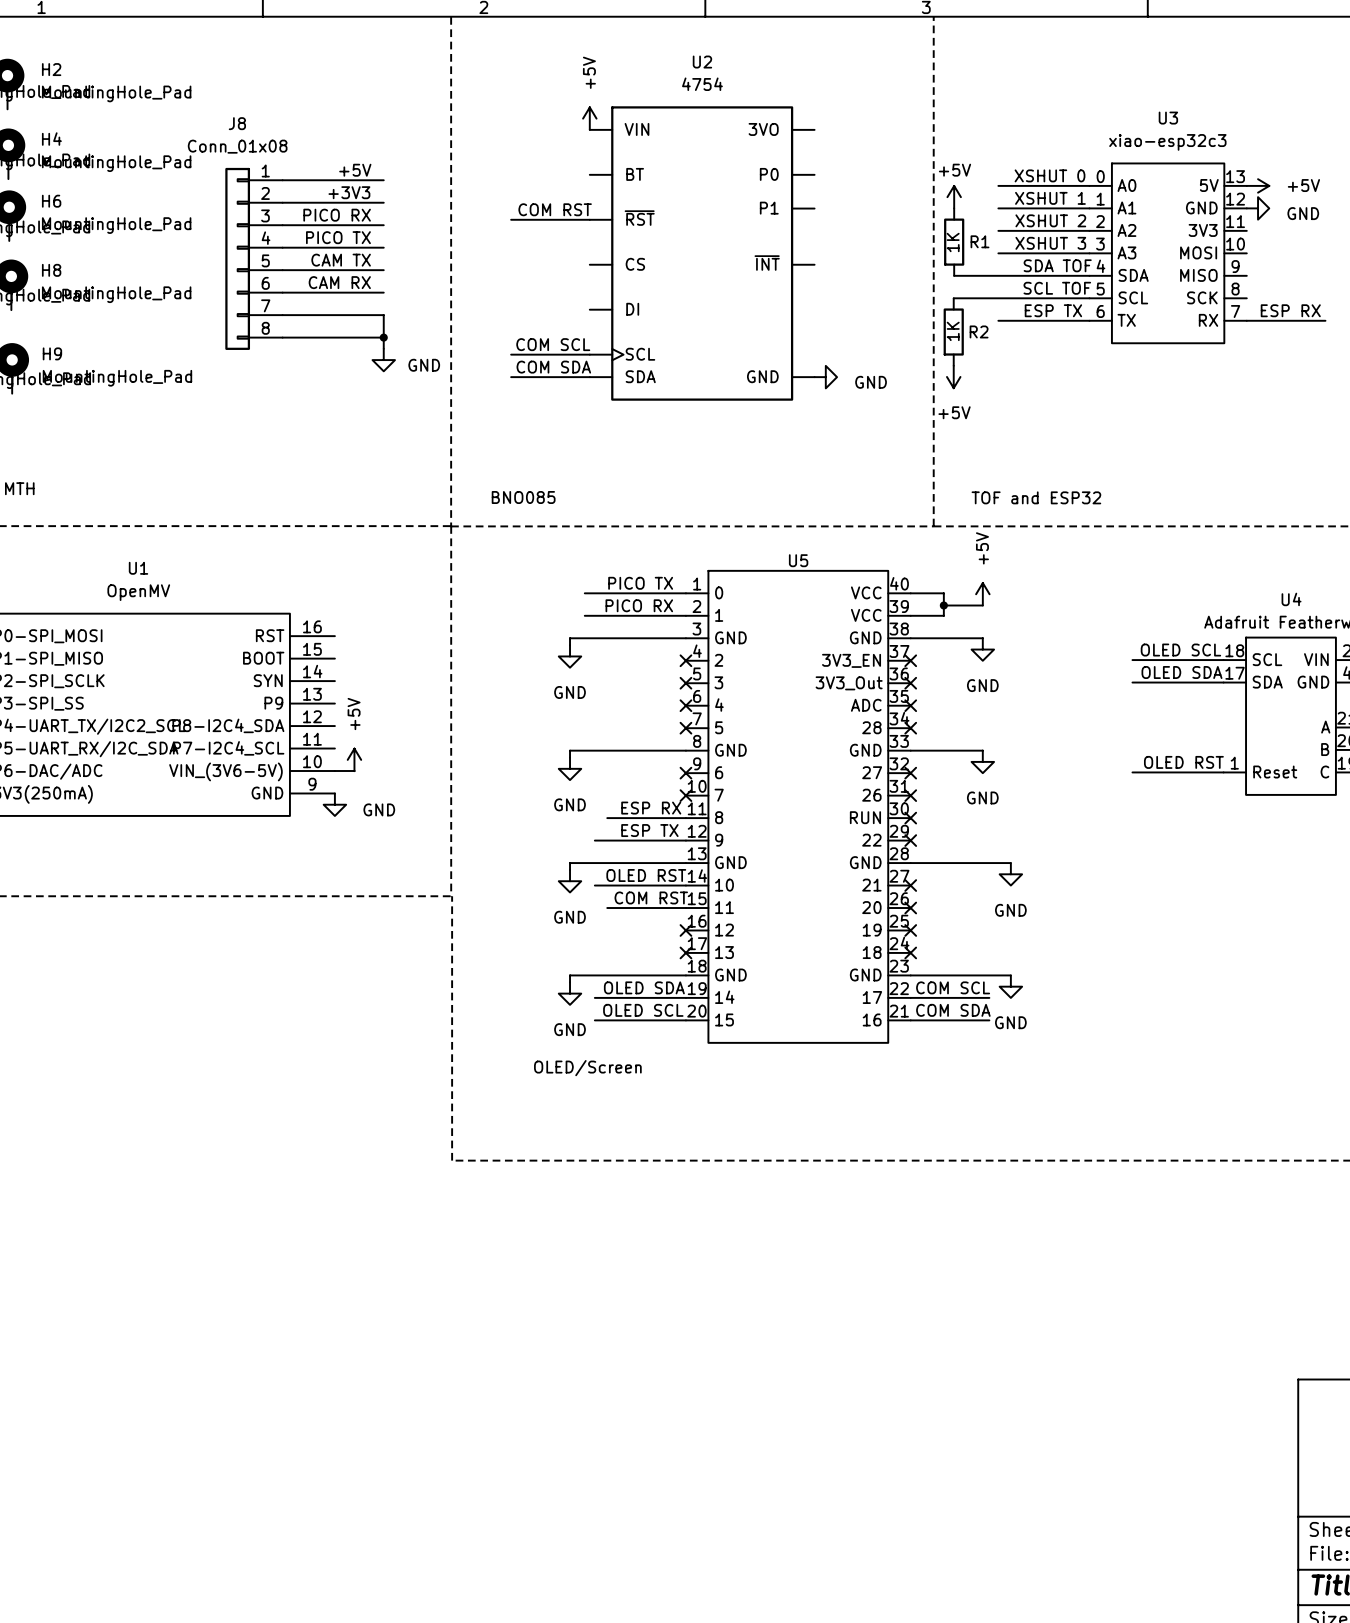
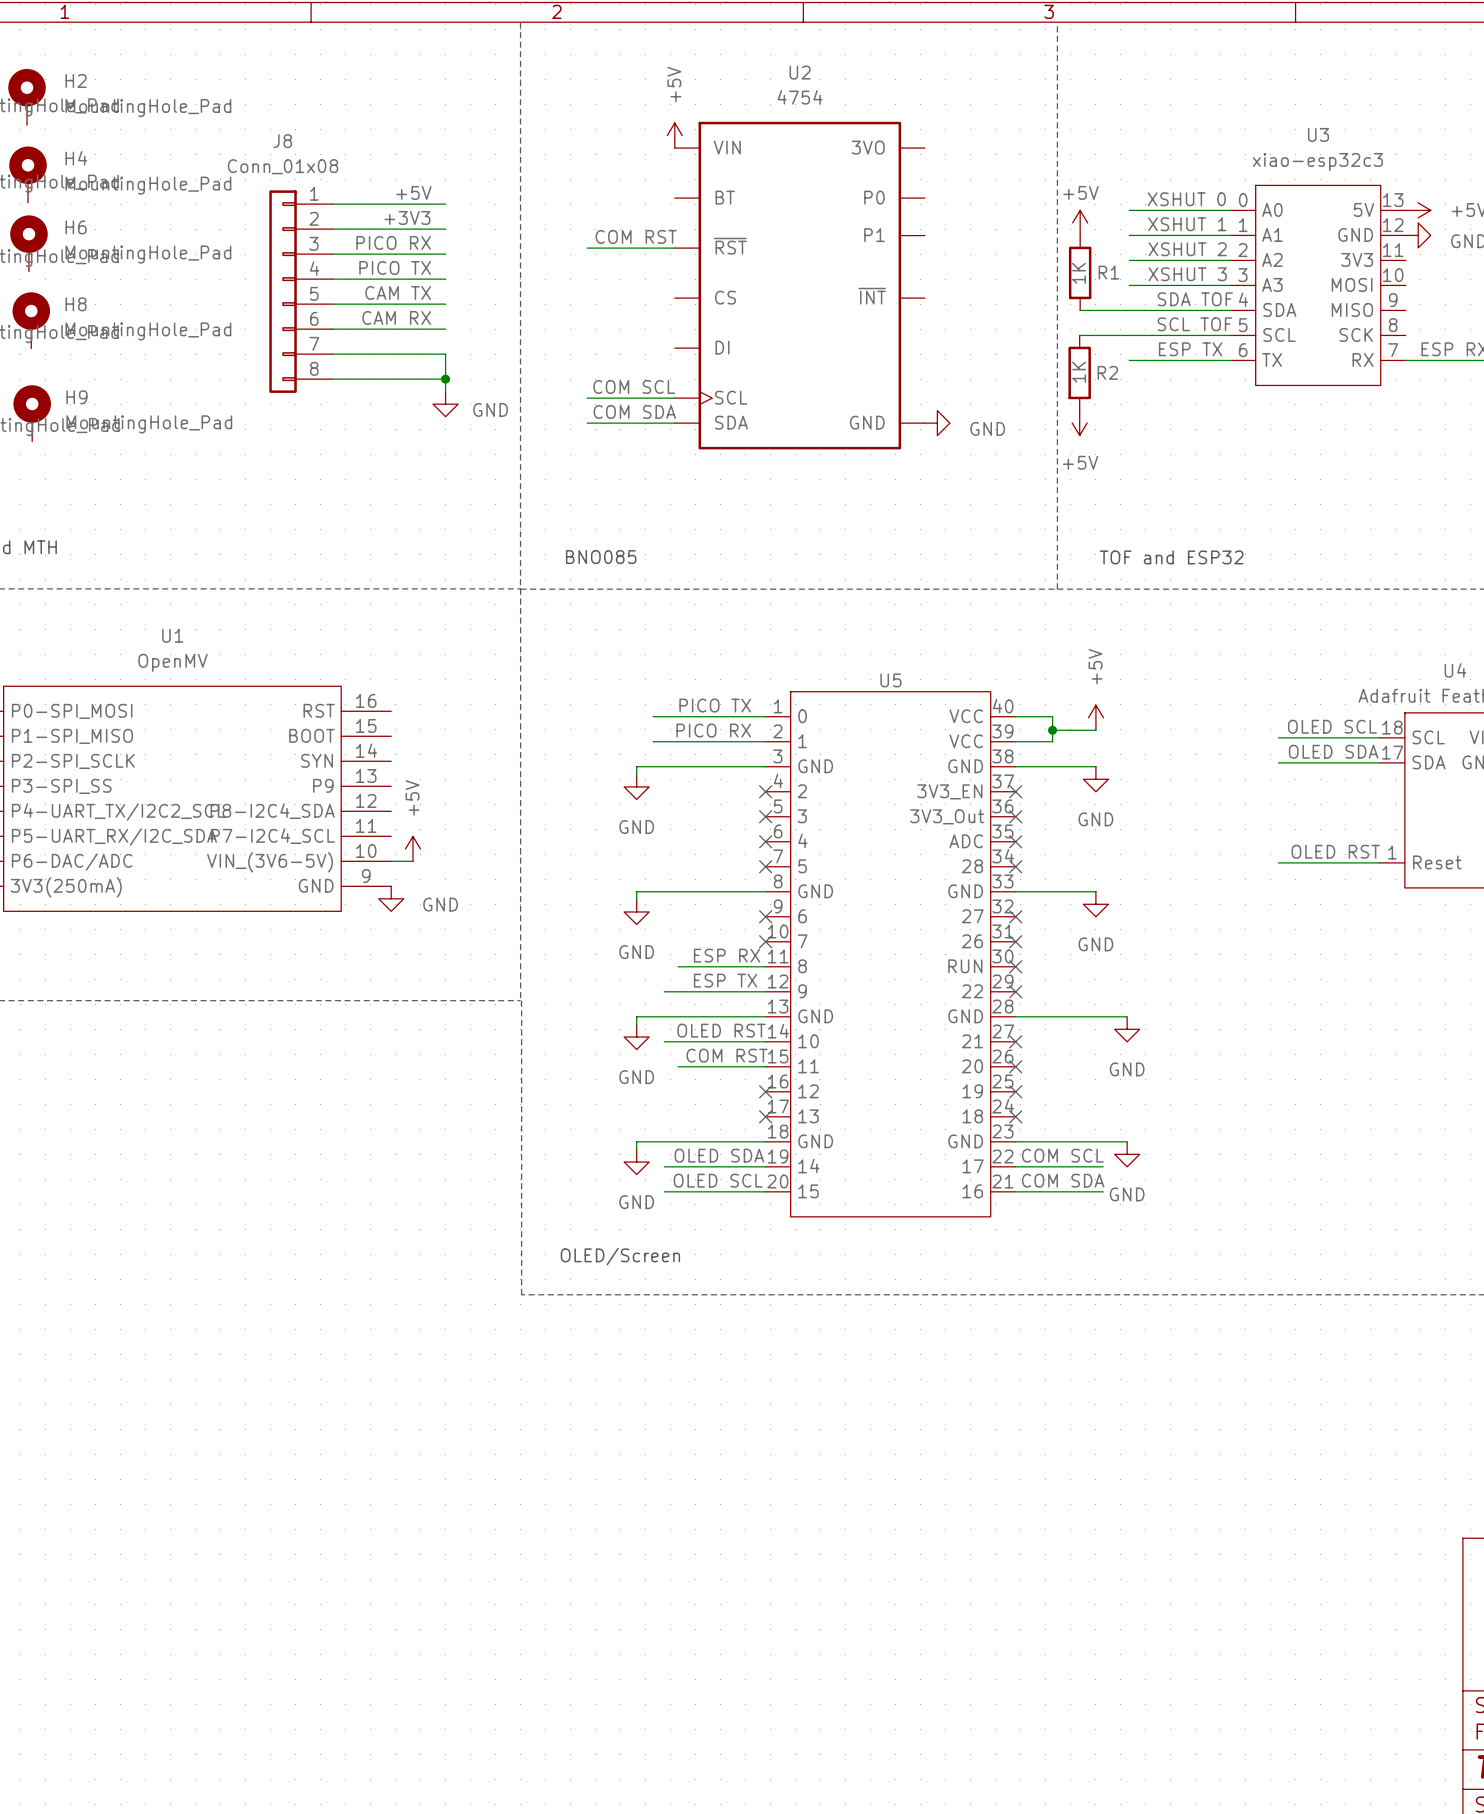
label position: PICO TX (640, 583) -> PICO TX (715, 705)
wire: (584, 593) (685, 593) -> (653, 716) (765, 716)
wire: (910, 593) (943, 593) (943, 615) (910, 615) -> (1015, 716) (1052, 716) (1052, 741) (1015, 741)
power symbol position: +5V (982, 594) -> +5V (1095, 717)
label position: PICO RX (639, 605) -> PICO RX (713, 730)
wire: (943, 605) (982, 605) -> (1052, 730) (1095, 730)
junction position: (943, 605) -> (1052, 730)
wire: (584, 615) (685, 615) -> (653, 741) (765, 741)
wire: (685, 638) (570, 638) (570, 645) -> (765, 766) (636, 766) (636, 774)
wire: (910, 638) (982, 638) -> (1015, 766) (1095, 766)
power symbol: GND (982, 649) -> none
power symbol: GND (570, 656) -> none
no-connect mark: (685, 660) -> none
no-connect mark: (910, 660) -> none
no-connect mark: (685, 683) -> none
no-connect mark: (910, 683) -> none
power symbol: none -> GND (1095, 779)
power symbol: none -> GND (636, 786)
no-connect mark: (685, 705) -> none
no-connect mark: (910, 705) -> none
no-connect mark: none -> (765, 791)
no-connect mark: none -> (1015, 791)
no-connect mark: (685, 728) -> none
no-connect mark: (910, 728) -> none
no-connect mark: none -> (765, 816)
no-connect mark: none -> (1015, 816)
wire: (685, 750) (570, 750) (570, 757) -> (765, 891) (636, 891) (636, 899)
wire: (910, 750) (982, 750) -> (1015, 891) (1095, 891)
no-connect mark: none -> (765, 841)
no-connect mark: none -> (1015, 841)
power symbol: GND (982, 761) -> none
power symbol: GND (570, 768) -> none
no-connect mark: (685, 773) -> none
no-connect mark: (910, 773) -> none
no-connect mark: none -> (765, 866)
no-connect mark: none -> (1015, 866)
no-connect mark: (685, 795) -> none
no-connect mark: (910, 795) -> none
U5 position: (798, 806) -> (890, 954)
label position: ESP RX (651, 808) -> ESP RX (727, 955)
power symbol: none -> GND (1095, 904)
power symbol: none -> GND (636, 911)
wire: (607, 818) (685, 818) -> (678, 966) (765, 966)
no-connect mark: (910, 818) -> none
no-connect mark: none -> (765, 916)
no-connect mark: none -> (1015, 916)
label position: ESP TX (649, 830) -> ESP TX (725, 980)
wire: (594, 840) (685, 840) -> (664, 991) (765, 991)
no-connect mark: (910, 840) -> none
no-connect mark: none -> (765, 941)
no-connect mark: none -> (1015, 941)
wire: (685, 863) (570, 863) (570, 869) -> (765, 1016) (636, 1016) (636, 1024)
wire: (910, 863) (1010, 863) -> (1015, 1016) (1127, 1016)
no-connect mark: none -> (1015, 966)
power symbol: GND (1010, 874) -> none
label position: OLED RST (646, 875) -> OLED RST (721, 1030)
power symbol: GND (570, 881) -> none
wire: (594, 885) (685, 885) -> (664, 1041) (765, 1041)
no-connect mark: (910, 885) -> none
no-connect mark: none -> (1015, 991)
label position: COM RST (651, 897) -> COM RST (727, 1055)
wire: (607, 908) (685, 908) -> (678, 1066) (765, 1066)
no-connect mark: (910, 908) -> none
power symbol: none -> GND (1127, 1029)
power symbol: none -> GND (636, 1037)
no-connect mark: (685, 930) -> none
no-connect mark: (910, 930) -> none
no-connect mark: none -> (1015, 1041)
no-connect mark: (685, 952) -> none
no-connect mark: (910, 952) -> none
no-connect mark: none -> (1015, 1066)
wire: (685, 975) (570, 975) (570, 982) -> (765, 1141) (636, 1141) (636, 1149)
wire: (910, 975) (1010, 975) -> (1015, 1141) (1127, 1141)
no-connect mark: none -> (765, 1091)
no-connect mark: none -> (1015, 1091)
power symbol: GND (1010, 986) -> none
label position: OLED SDA (644, 987) -> OLED SDA (719, 1155)
label position: COM SCL (953, 987) -> COM SCL (1062, 1155)
power symbol: GND (570, 993) -> none
wire: (594, 997) (685, 997) -> (664, 1166) (765, 1166)
wire: (910, 997) (989, 997) -> (1015, 1166) (1103, 1166)
no-connect mark: none -> (765, 1116)
no-connect mark: none -> (1015, 1116)
label position: OLED SCL (643, 1010) -> OLED SCL (718, 1180)
label position: COM SDA (953, 1010) -> COM SDA (1063, 1180)
wire: (594, 1020) (685, 1020) -> (664, 1191) (765, 1191)
wire: (910, 1020) (989, 1020) -> (1015, 1191) (1103, 1191)
power symbol: none -> GND (1127, 1154)
power symbol: none -> GND (636, 1162)
text position: OLED/Screen (587, 1068) -> OLED/Screen (620, 1256)

